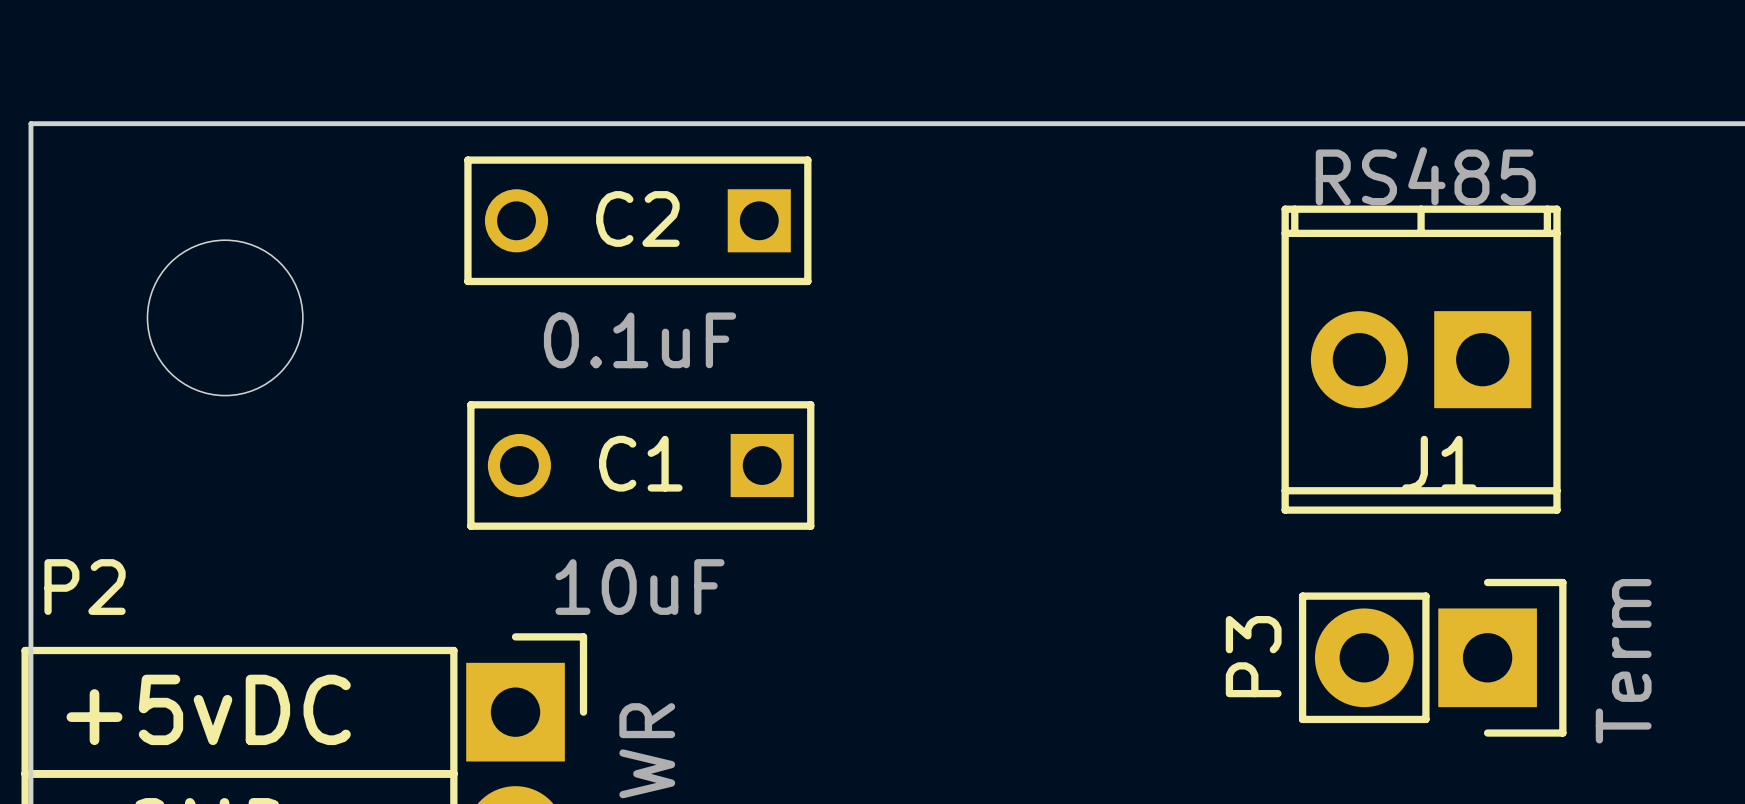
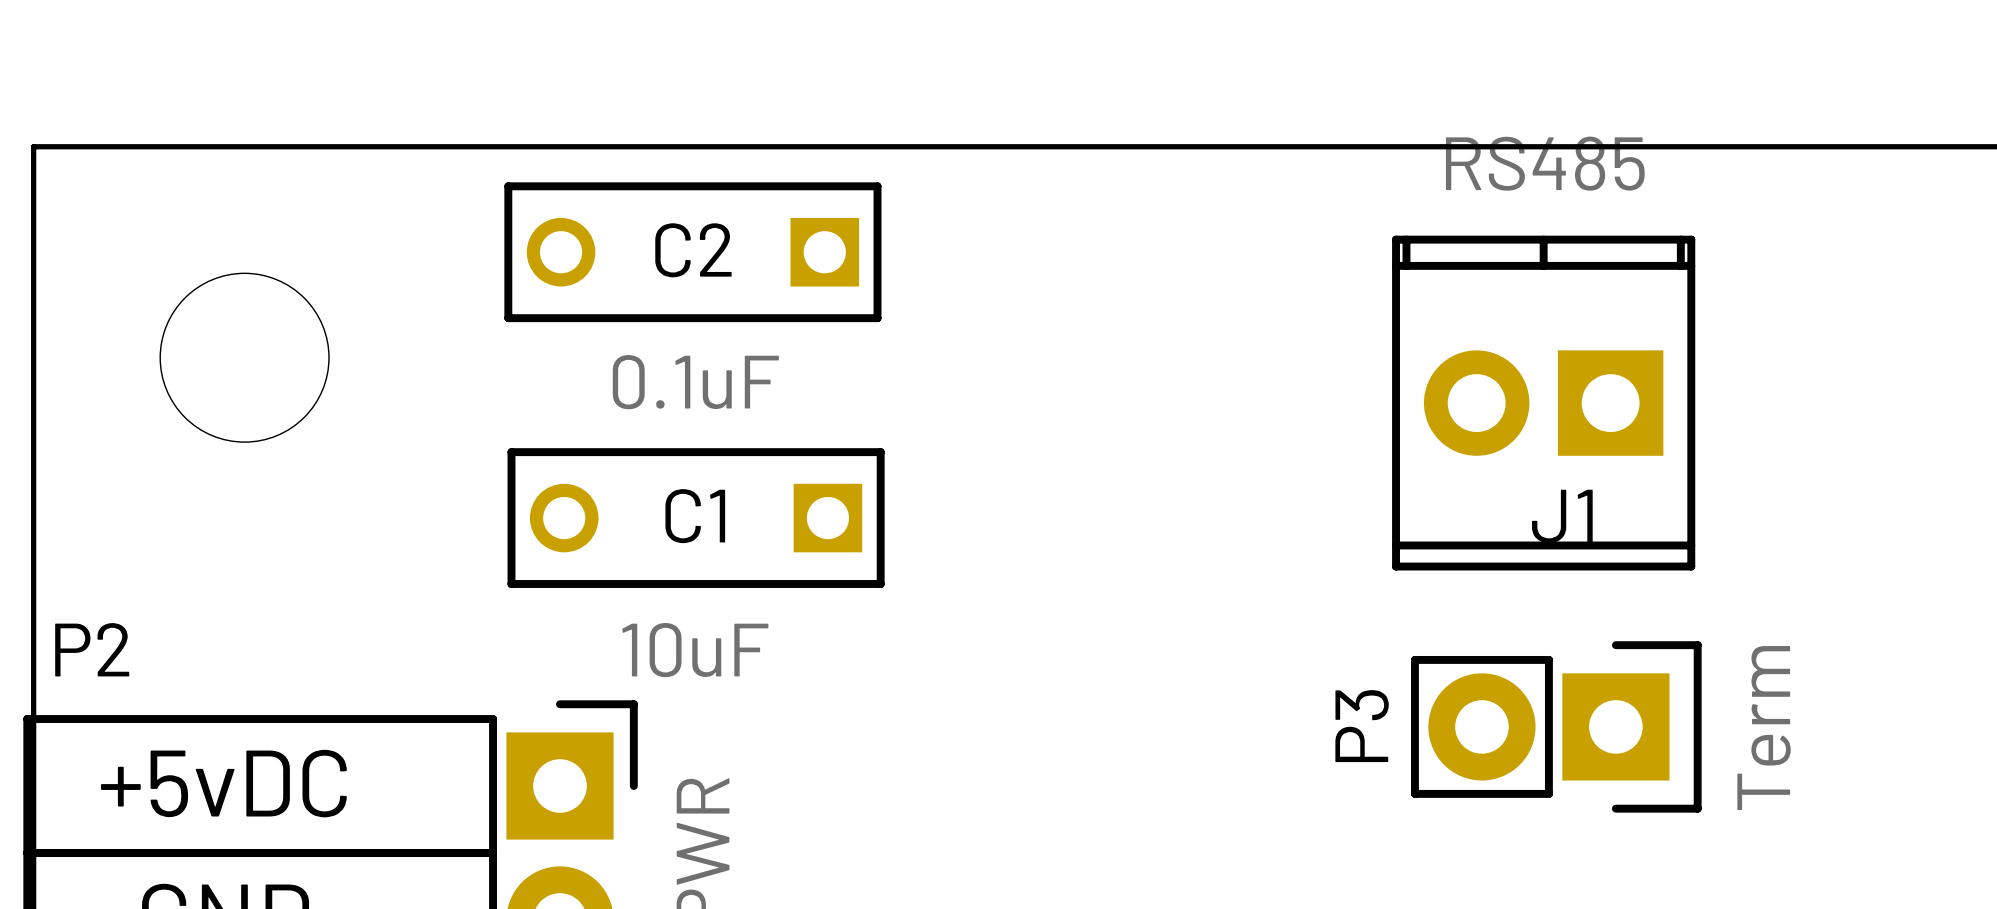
J1 value position: RS485 (1425, 176) -> RS485 (1545, 163)

